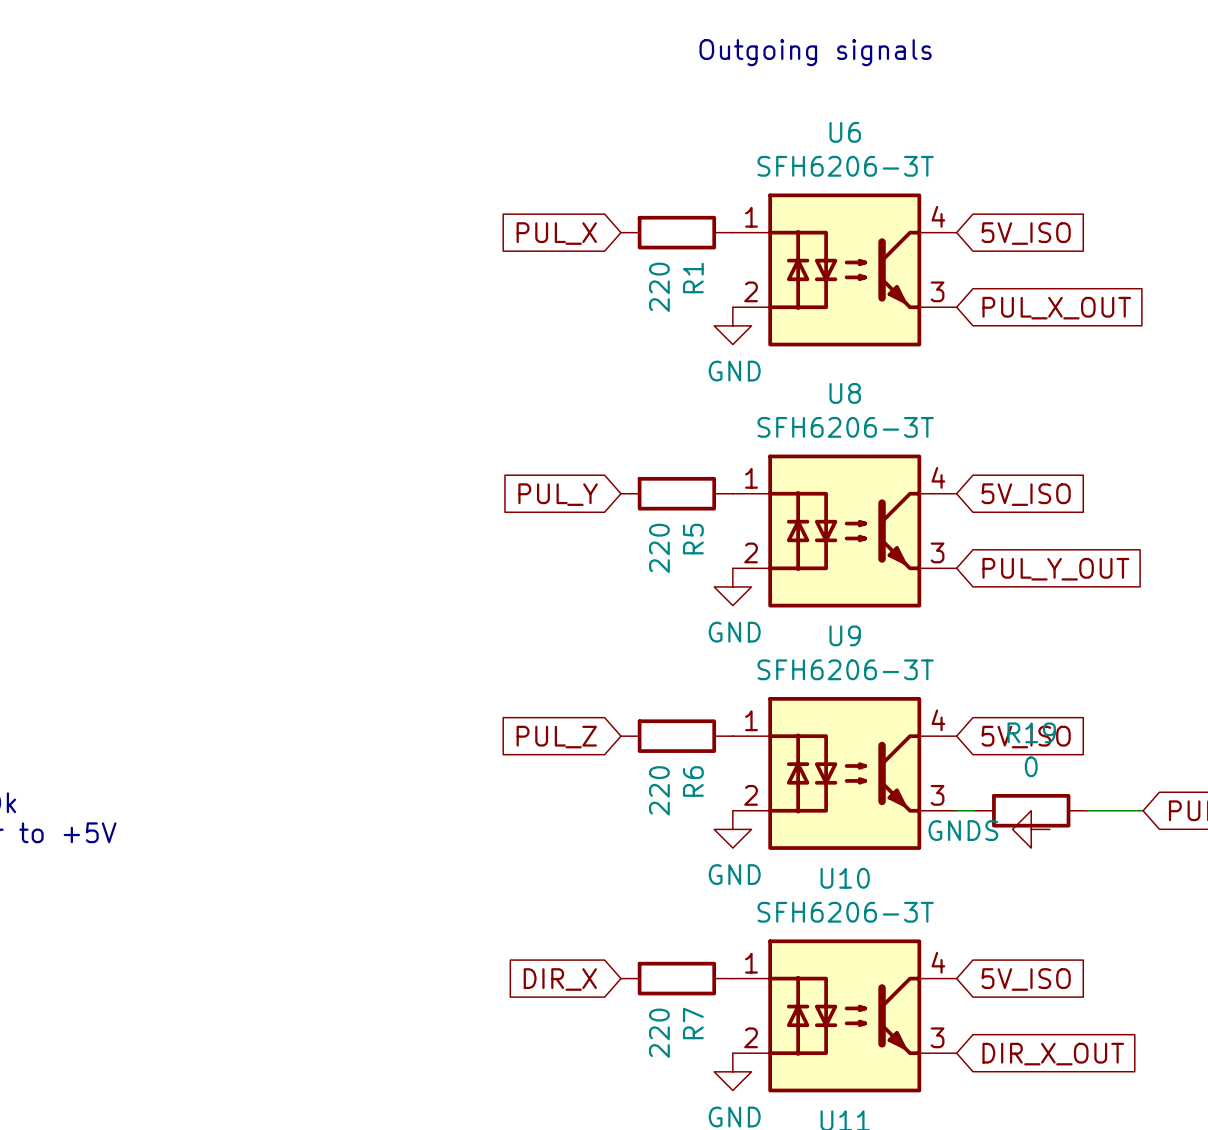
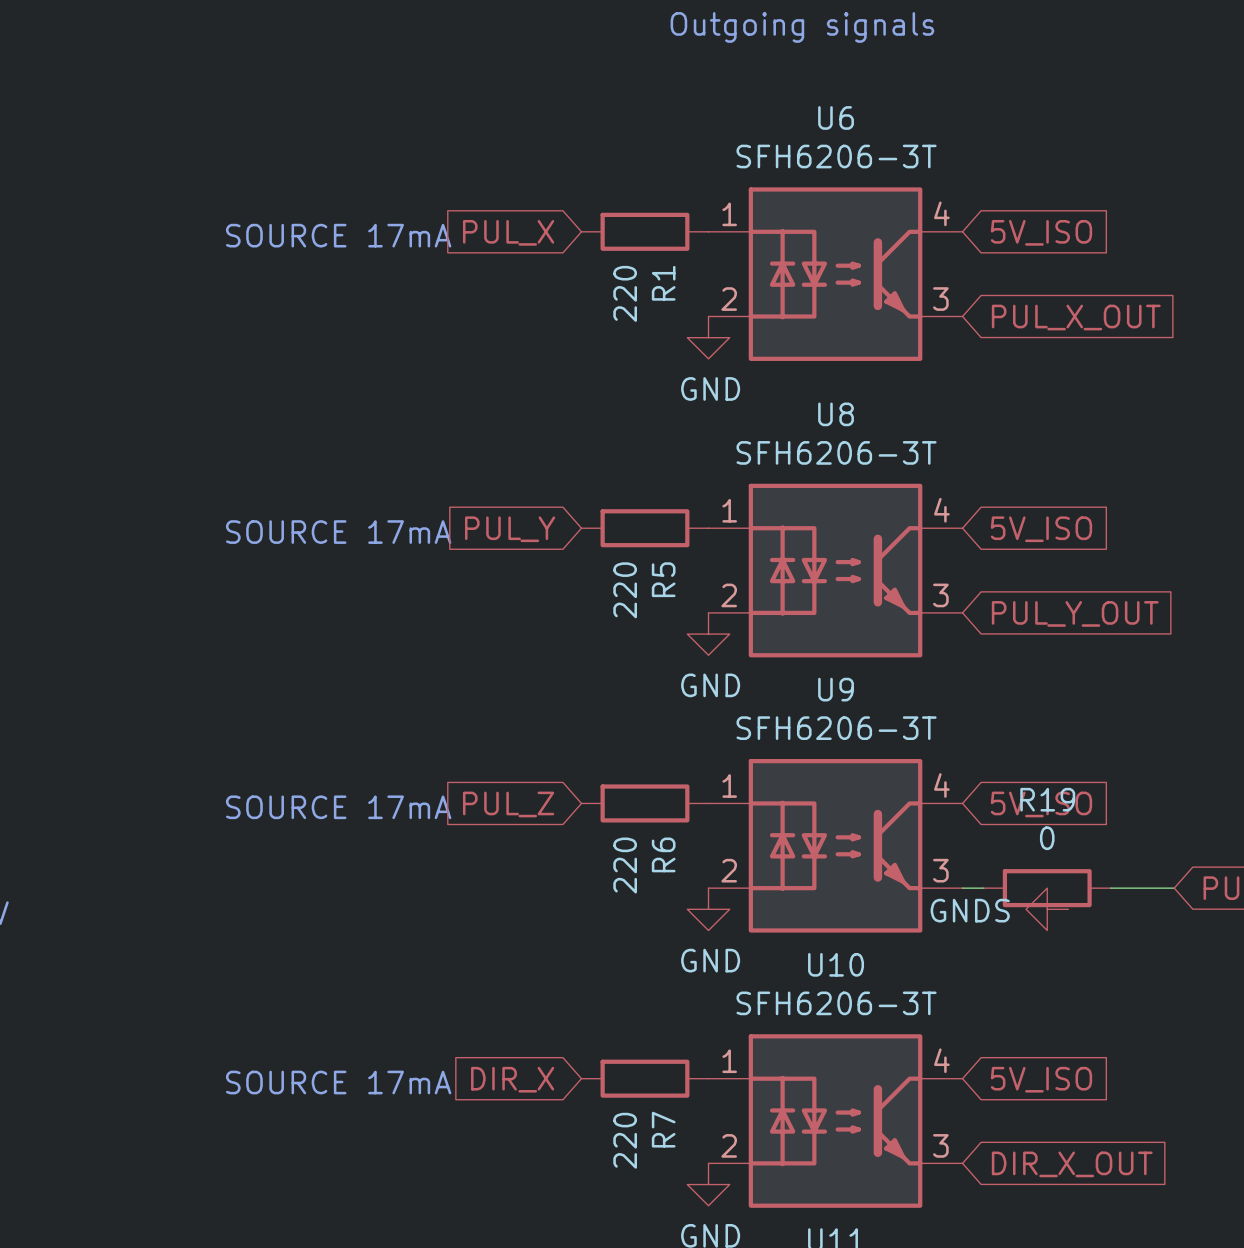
text: none -> SOURCE 17mA (338, 235)
text: none -> SOURCE 17mA (338, 532)
text: none -> SOURCE 17mA (338, 807)
text: none -> SOURCE 17mA (338, 1082)

